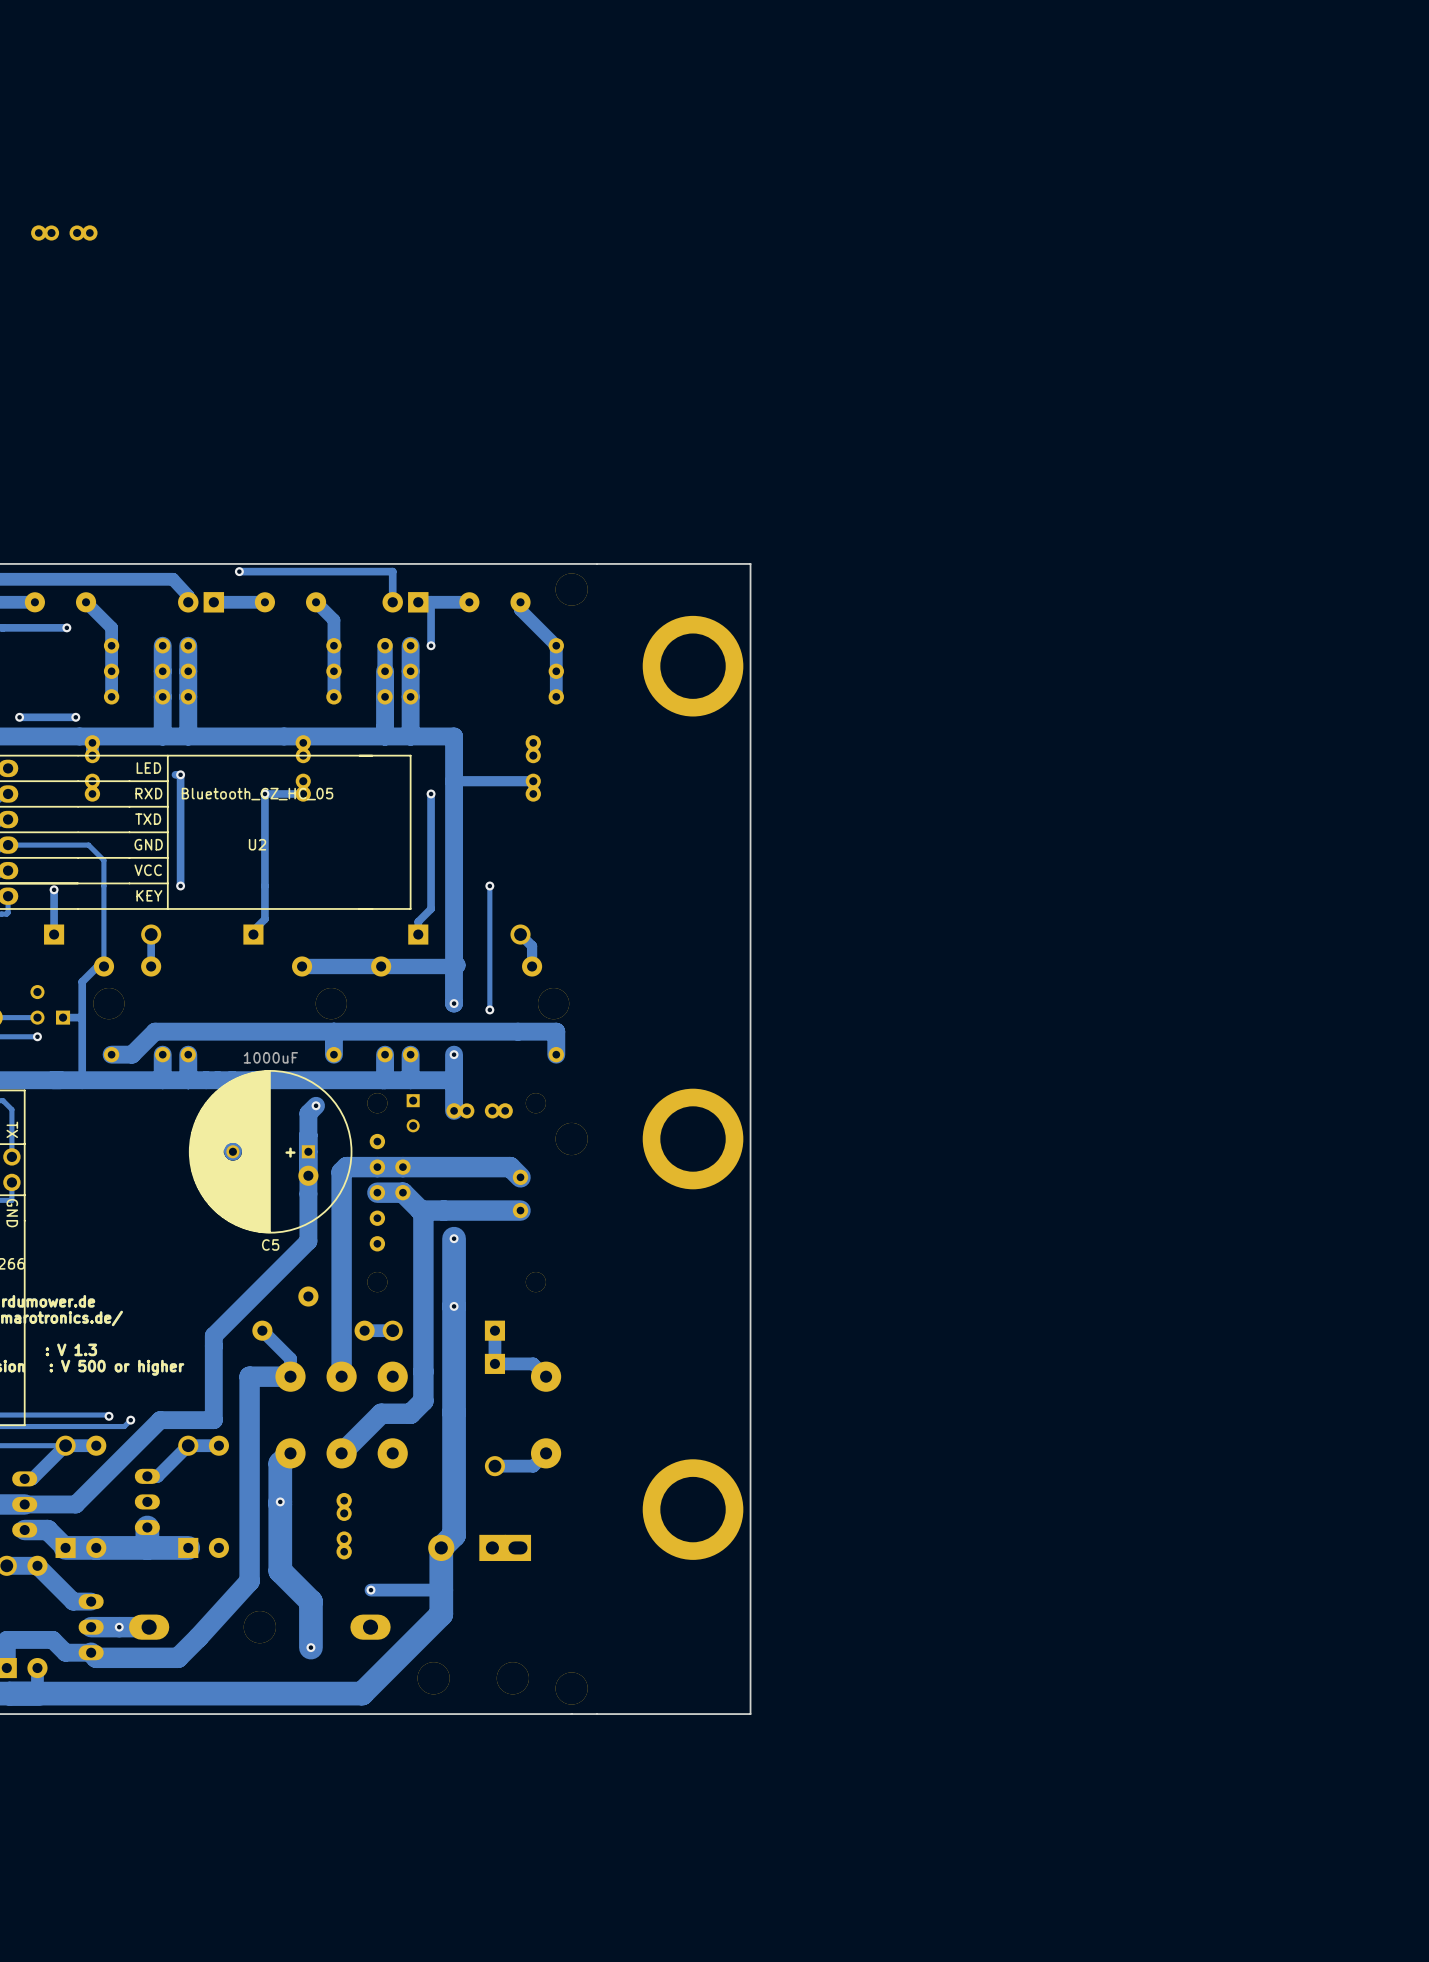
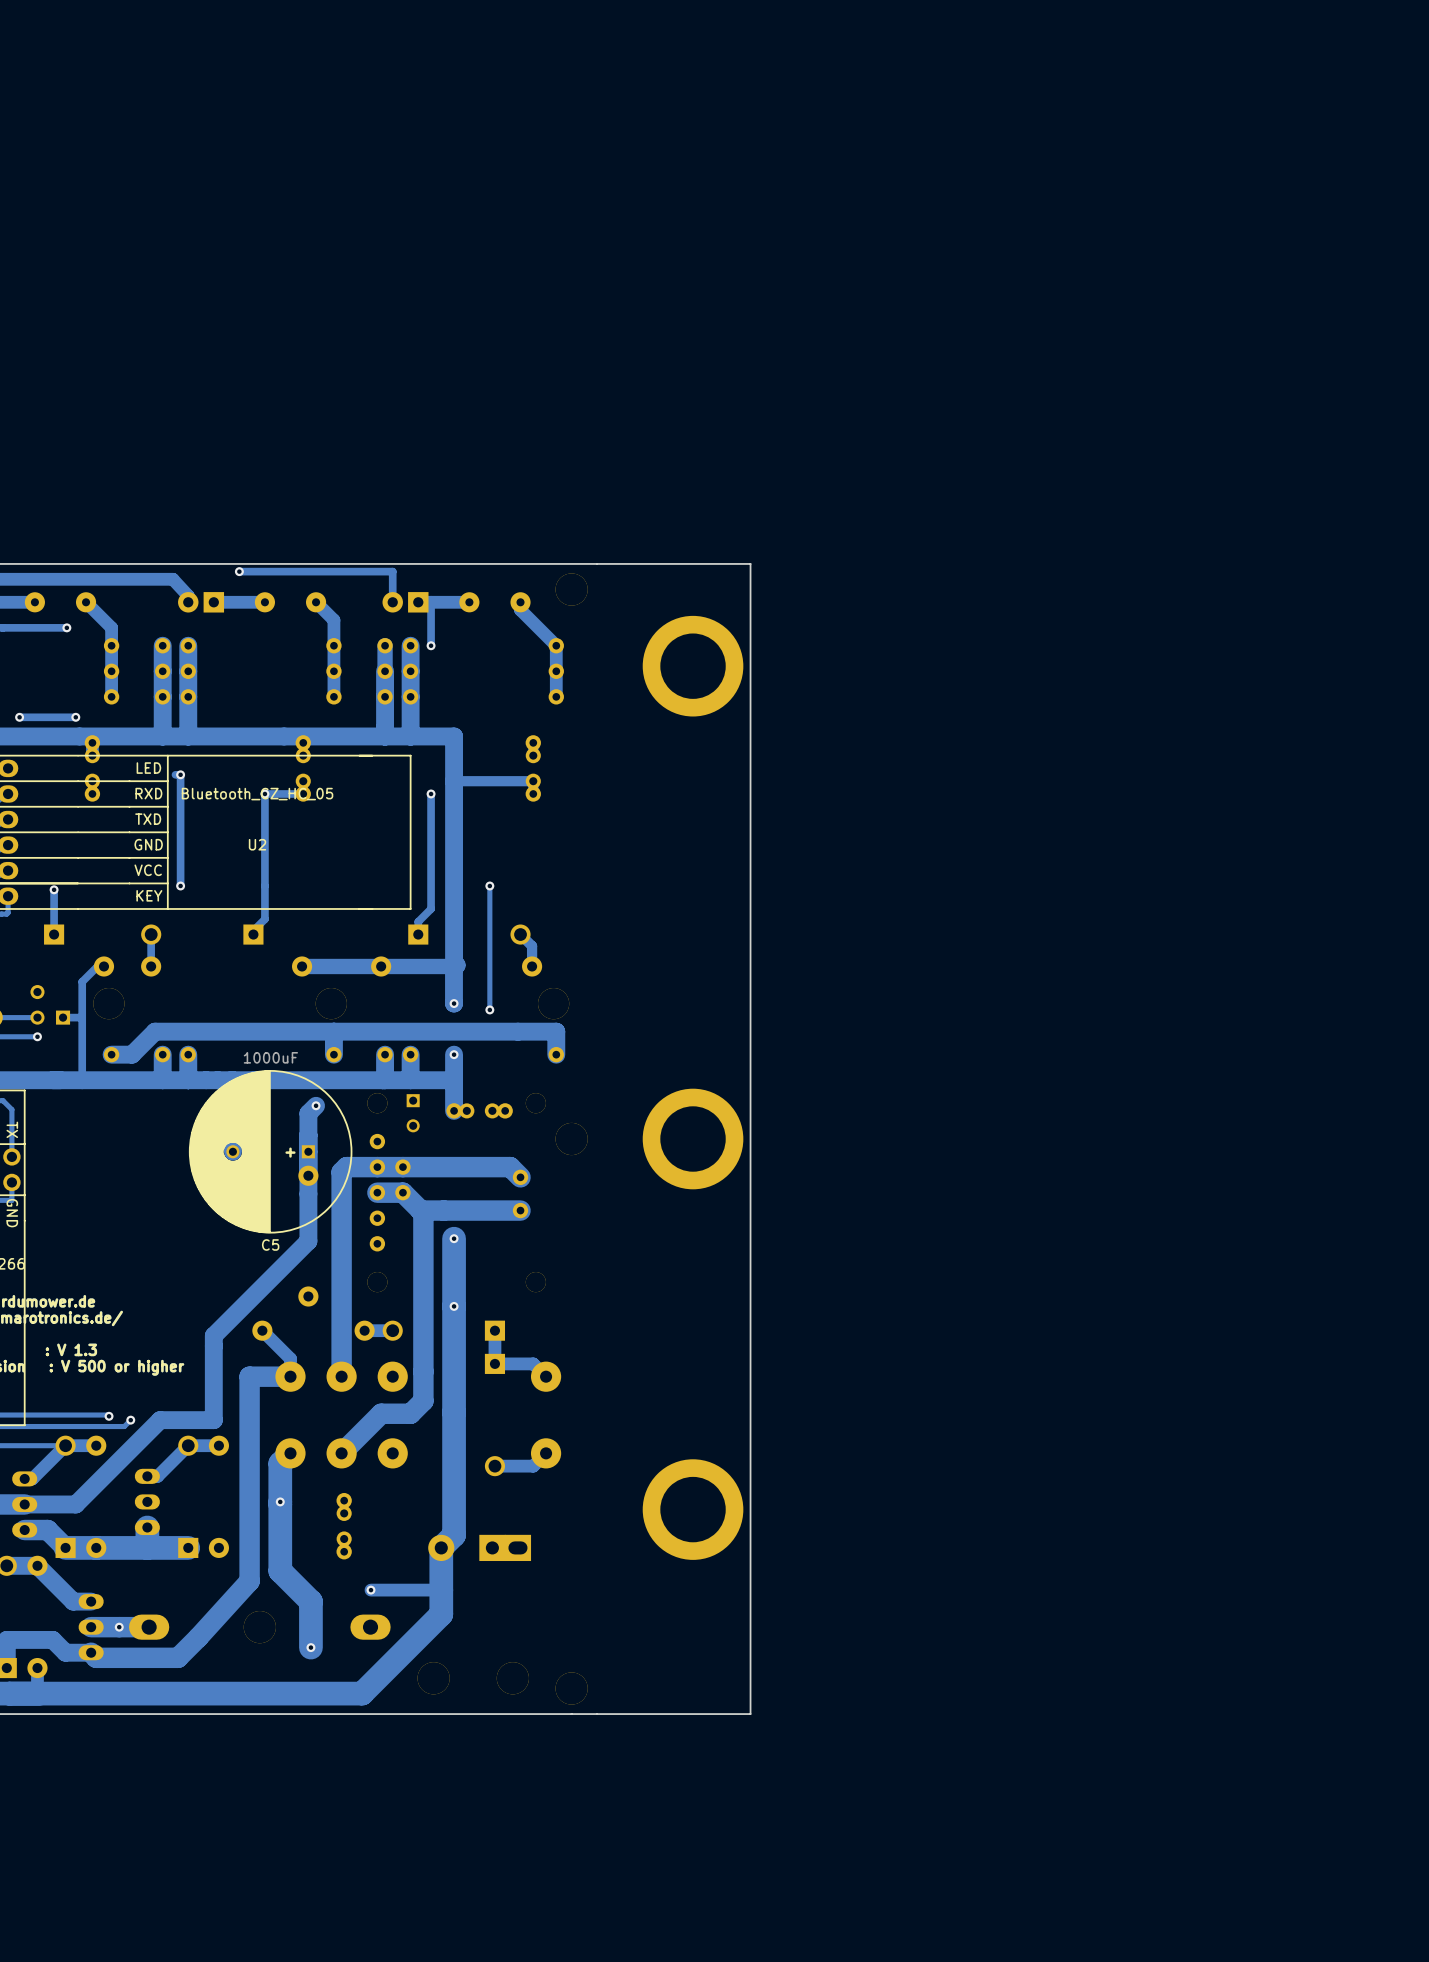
part: (64, 232) -> none
track: (8, 845) (88, 845) (103, 860) (103, 966) -> none

